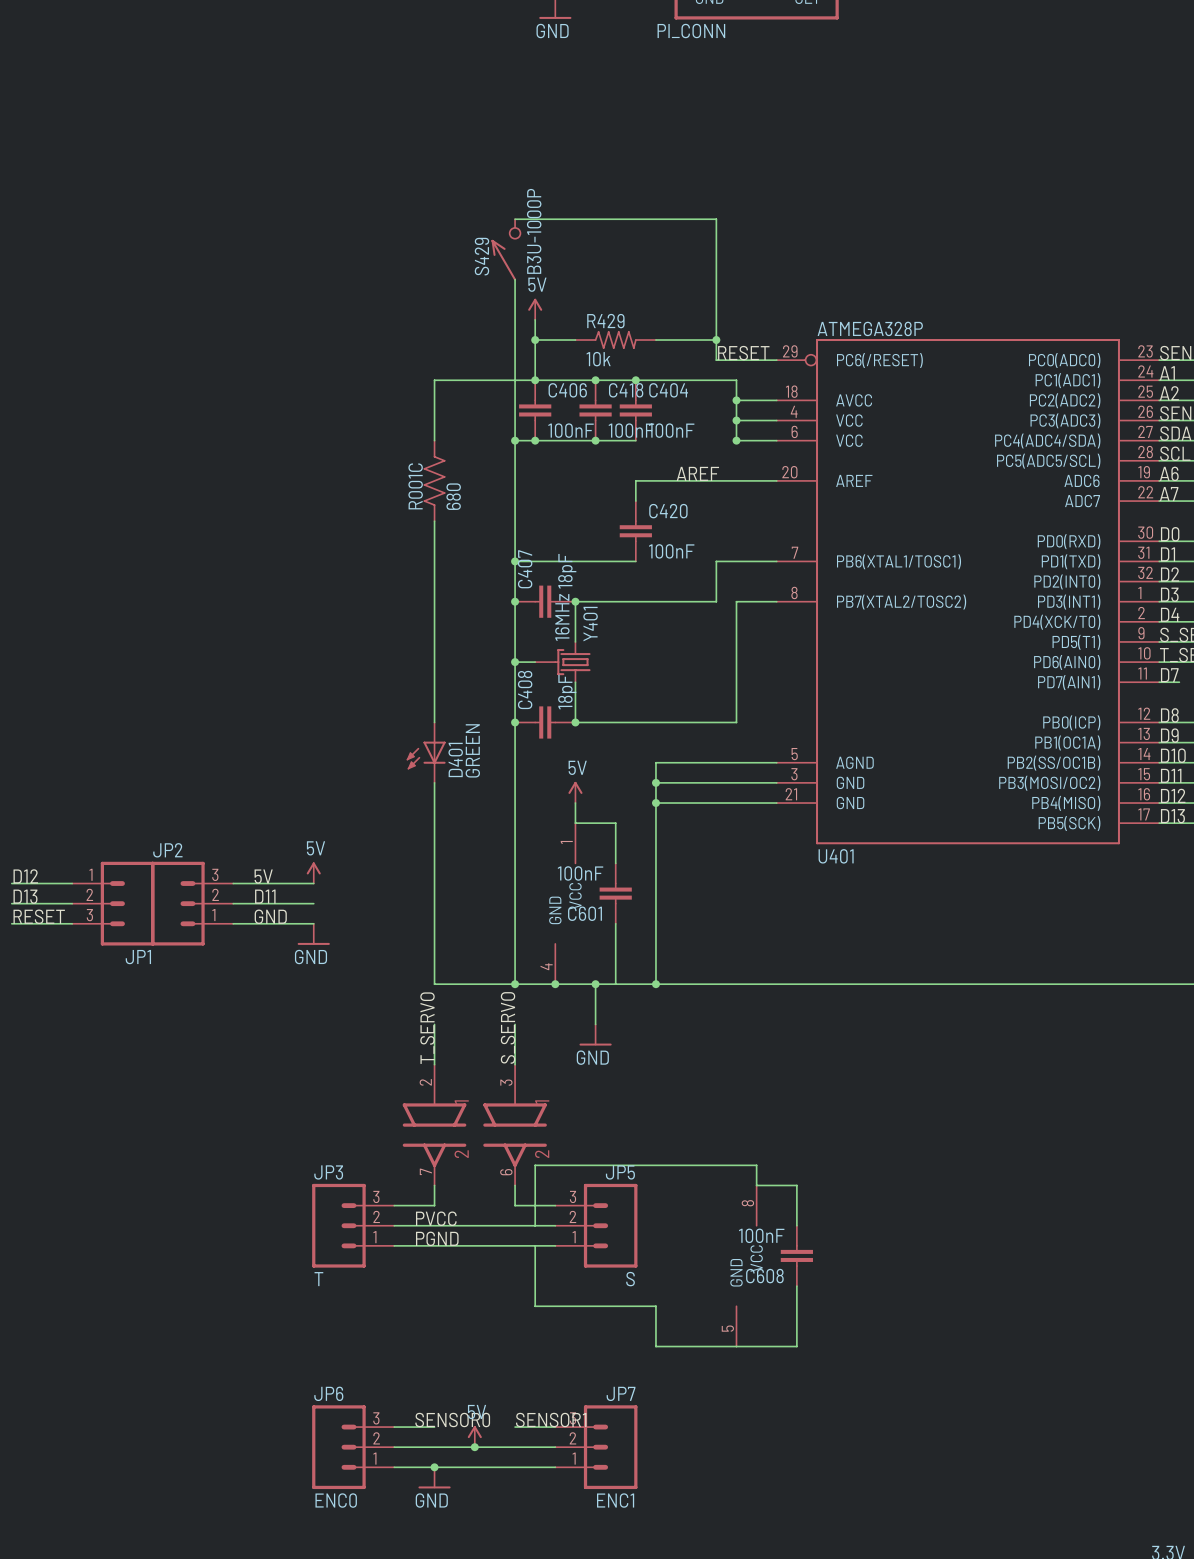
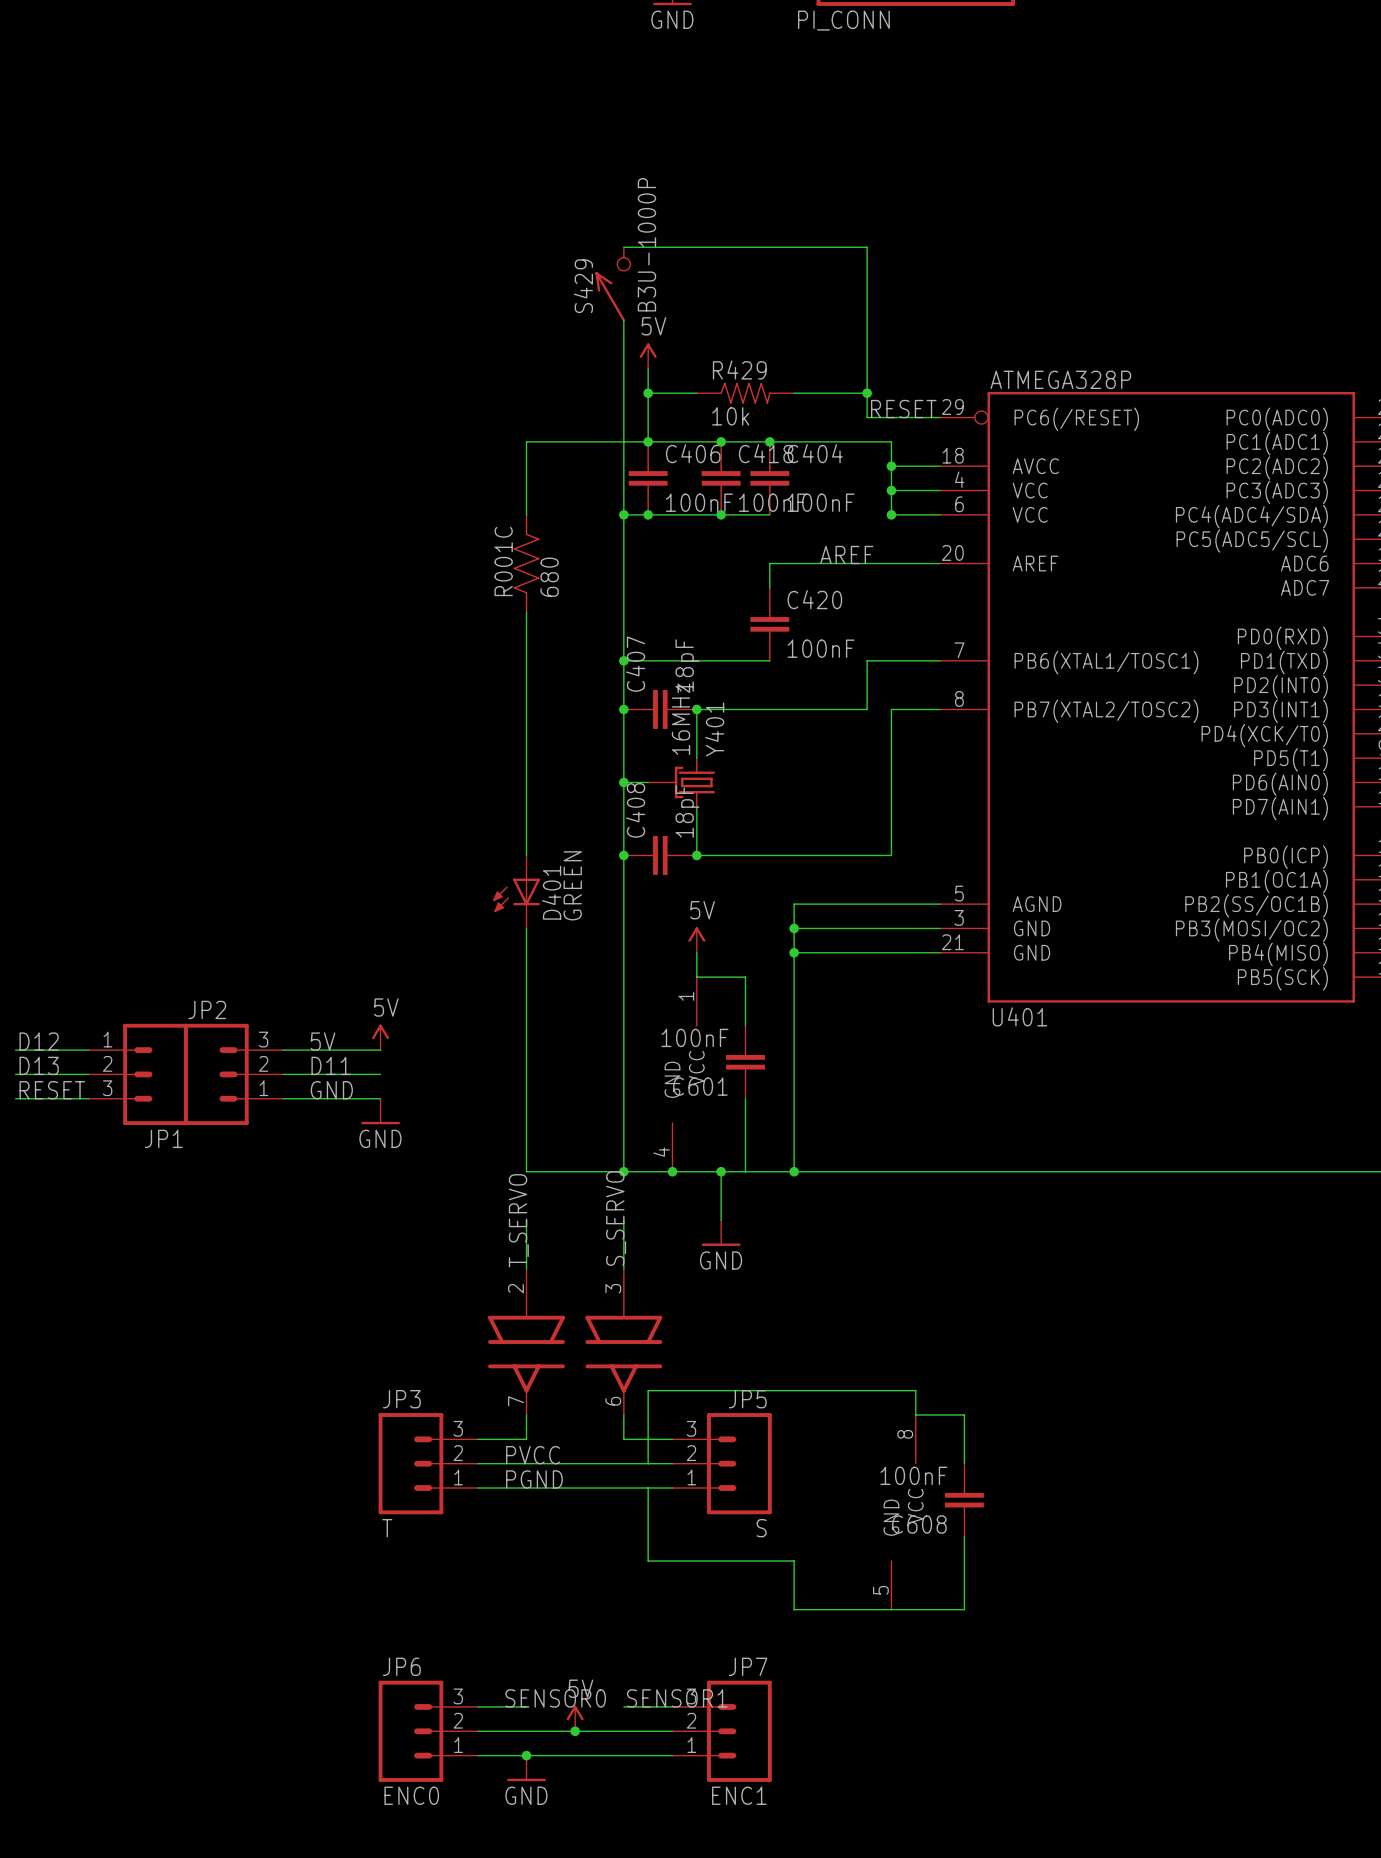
part text: 1 (461, 1102) -> none
part text: 1 (542, 1102) -> none
part text: 2 (461, 1154) -> none
part text: 2 (542, 1154) -> none

